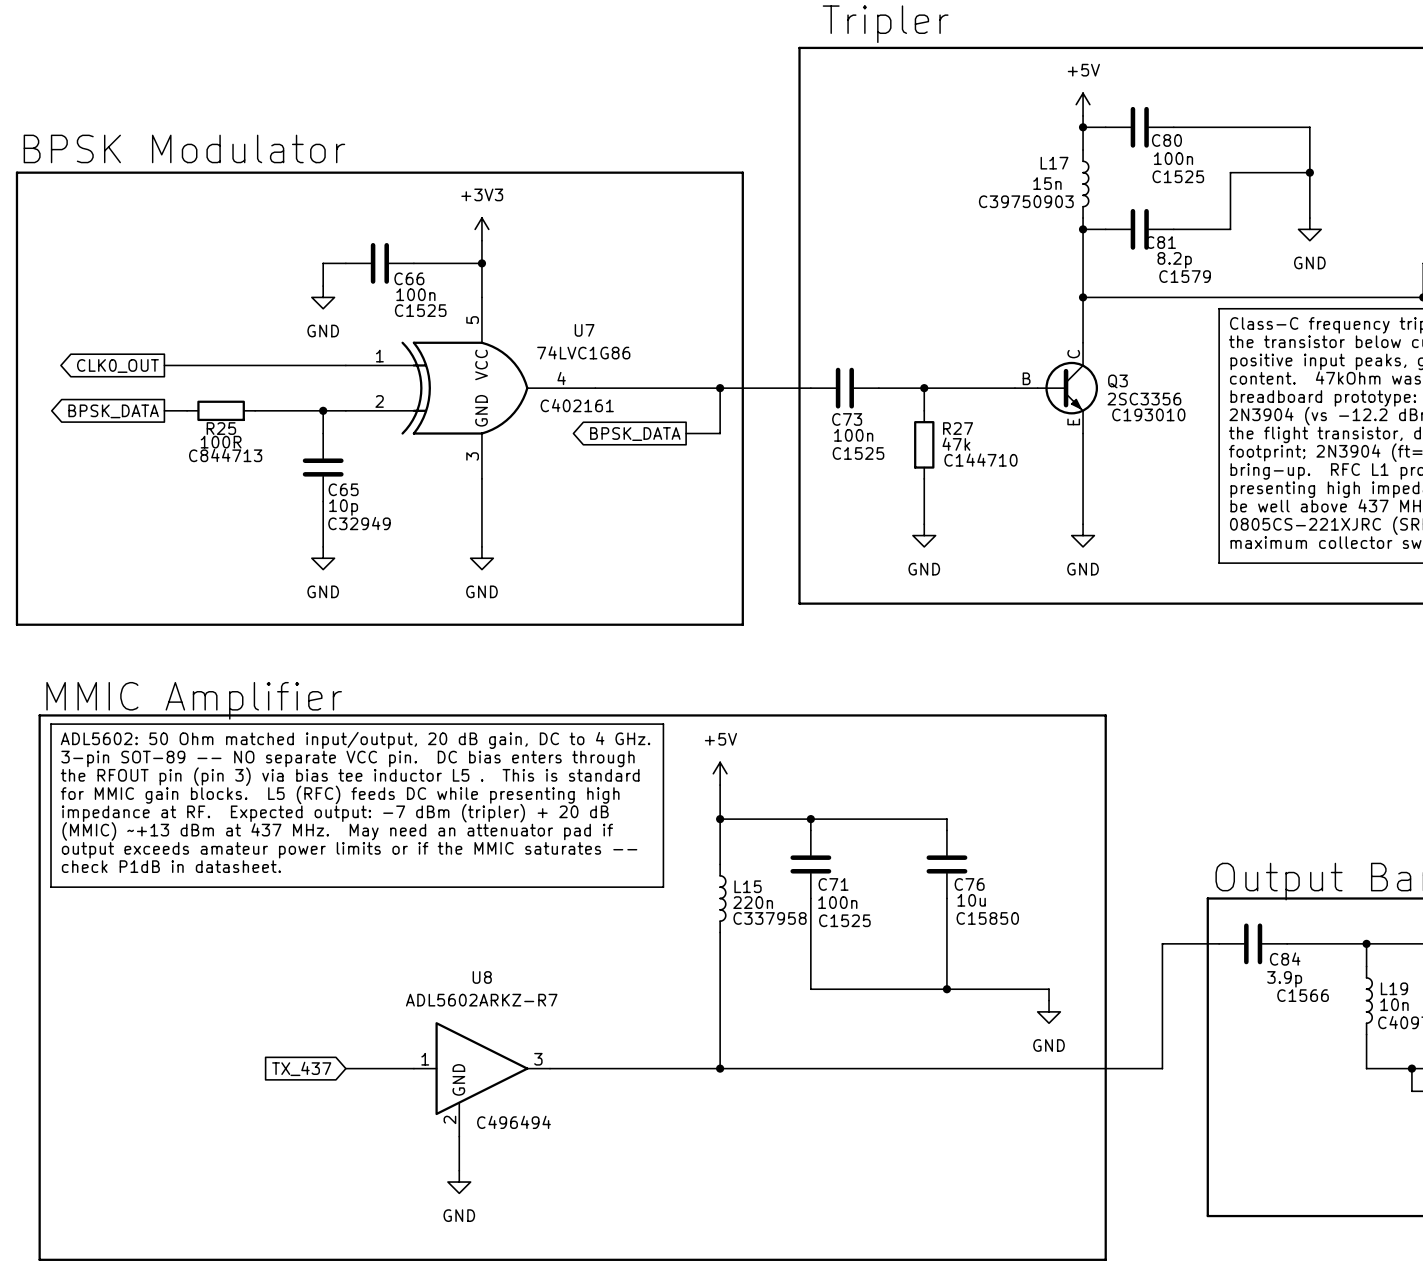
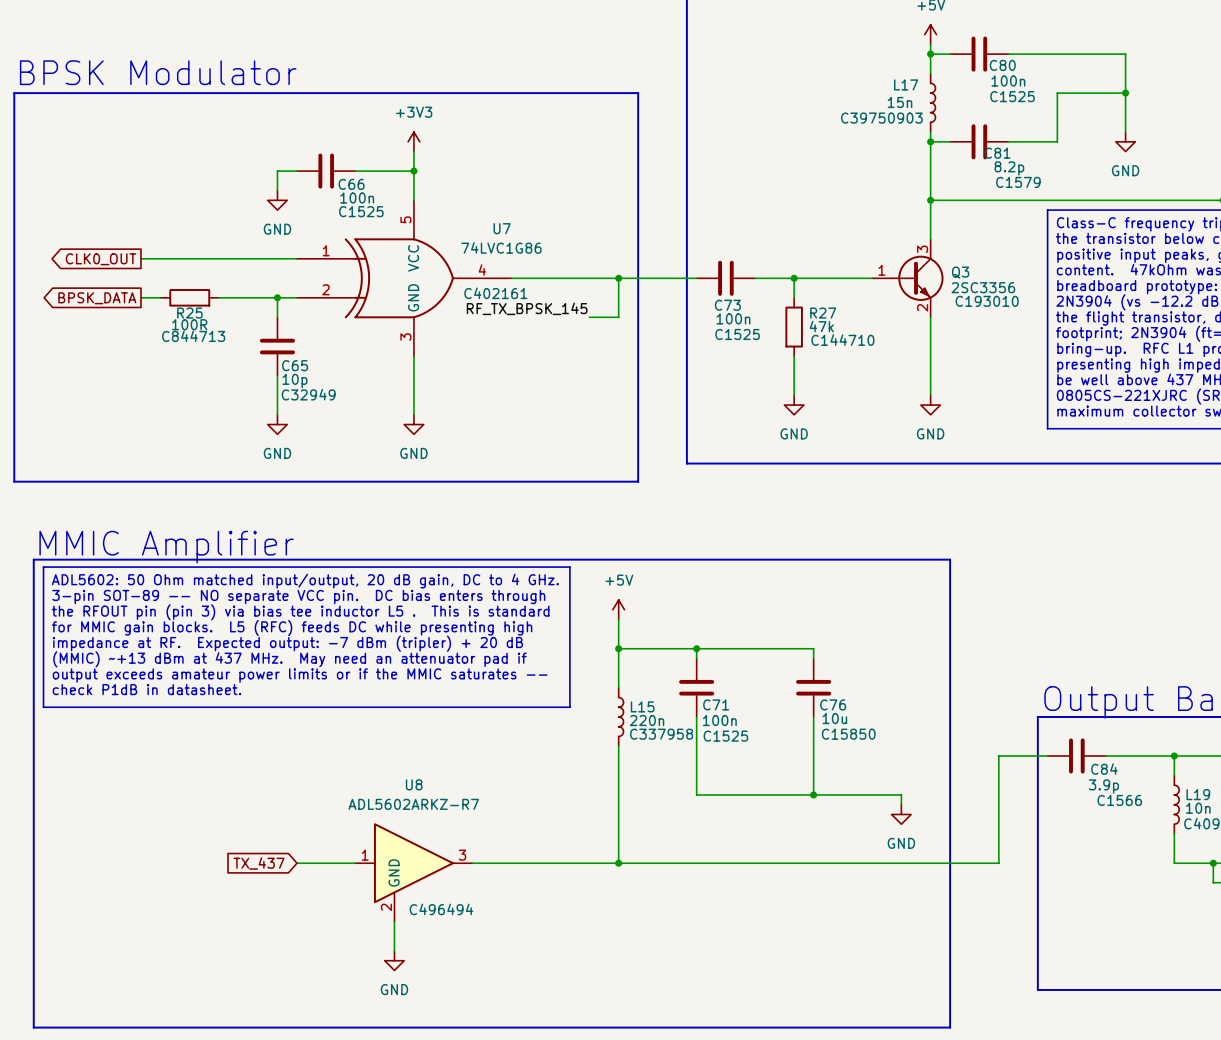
Q3 symbol: [1014, 342, 1099, 434] -> [872, 239, 944, 318]
label: none -> RF_TX_BPSK_145 (527, 308)
global label: BPSK_DATA (635, 434) -> none

